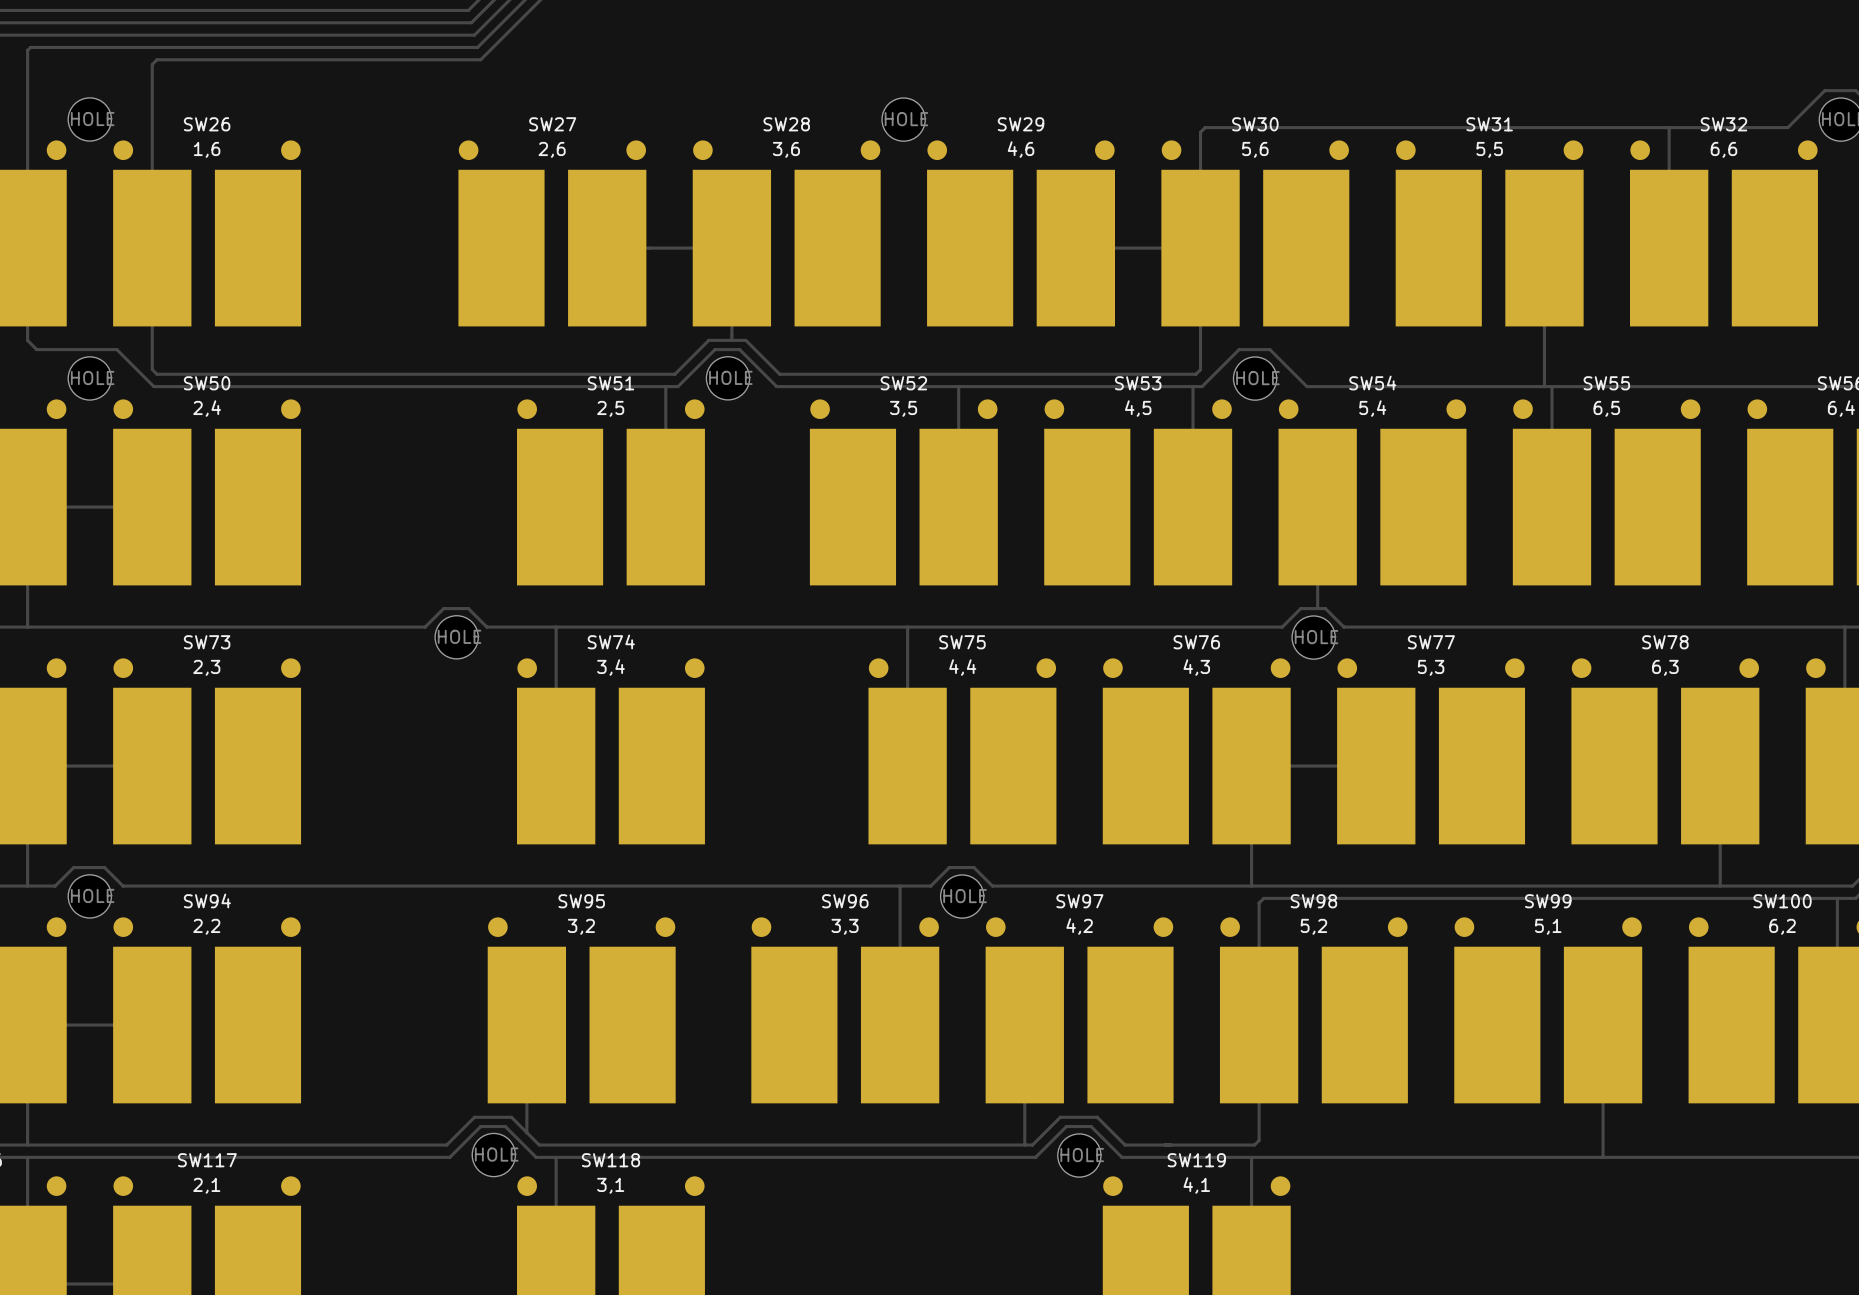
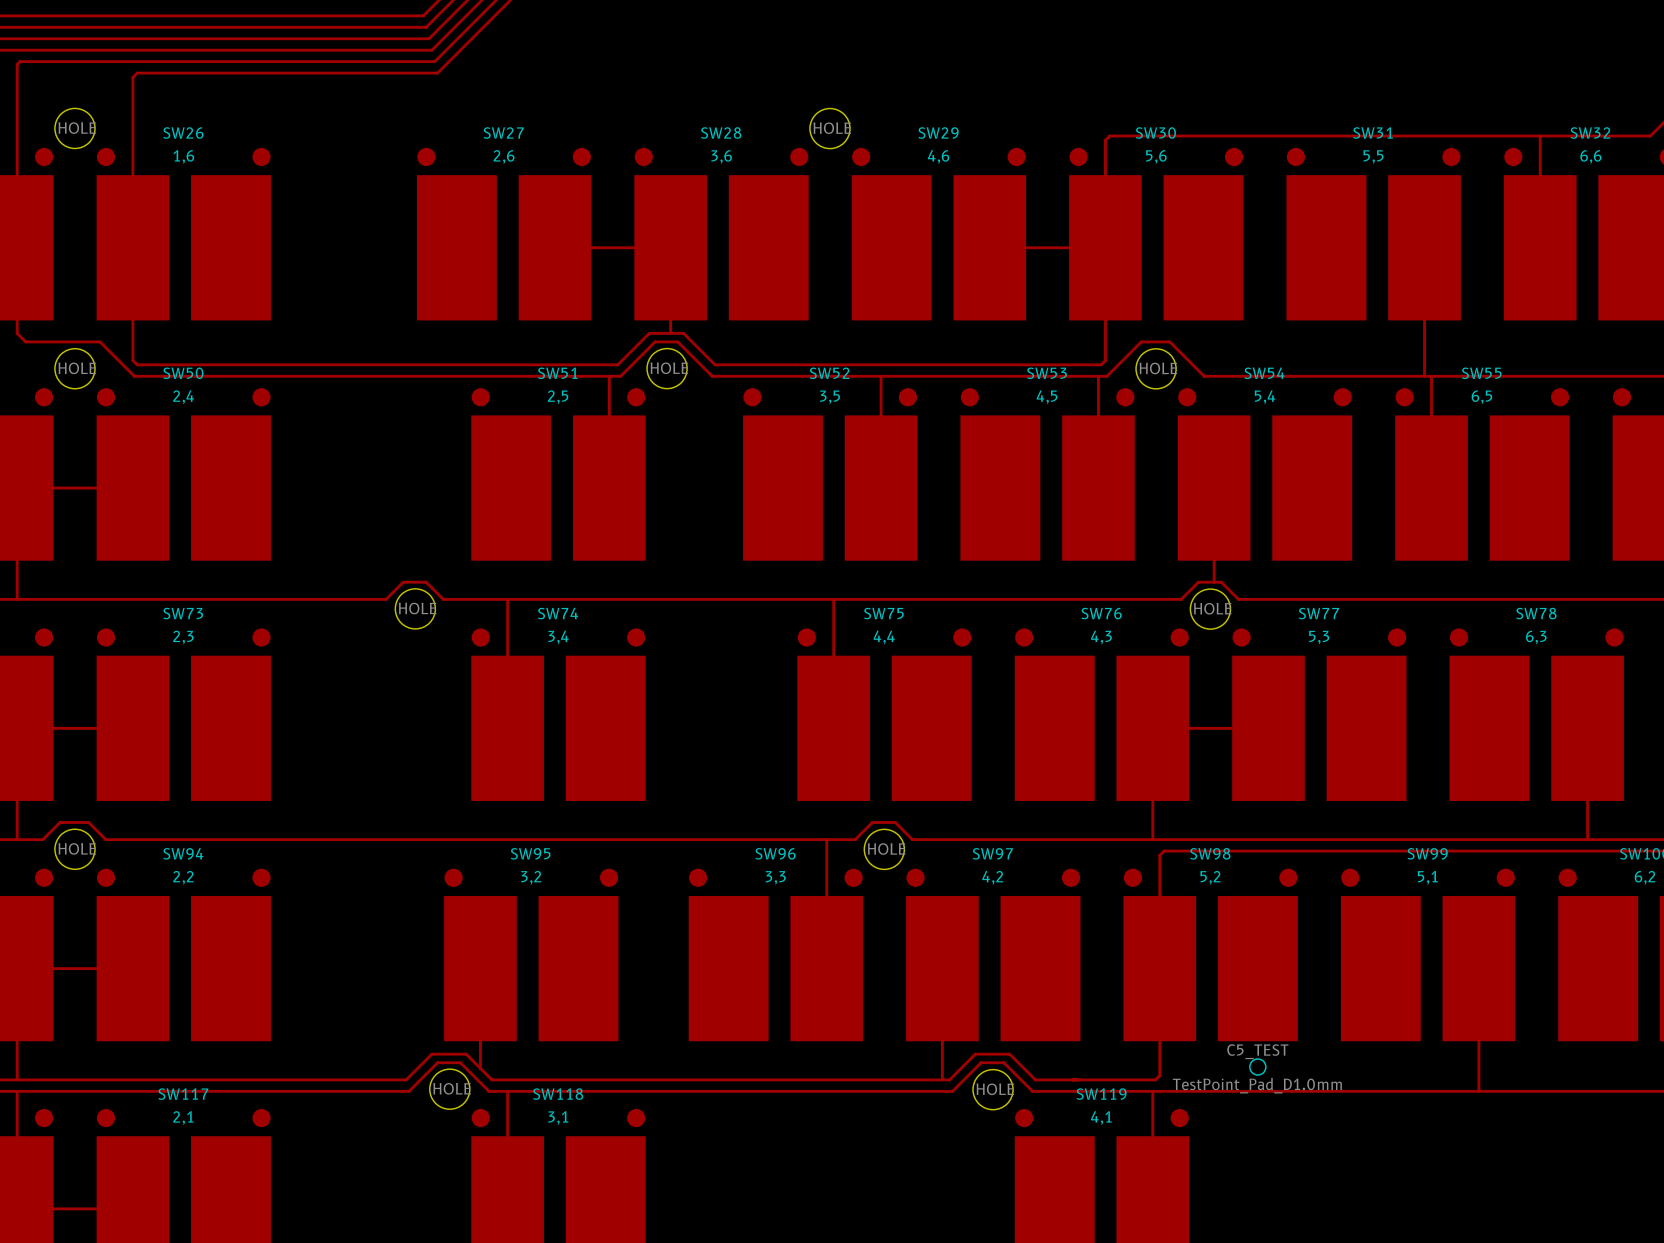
C5_TEST: none -> TestPoint_Pad_D1.0mm (1257, 1067)

